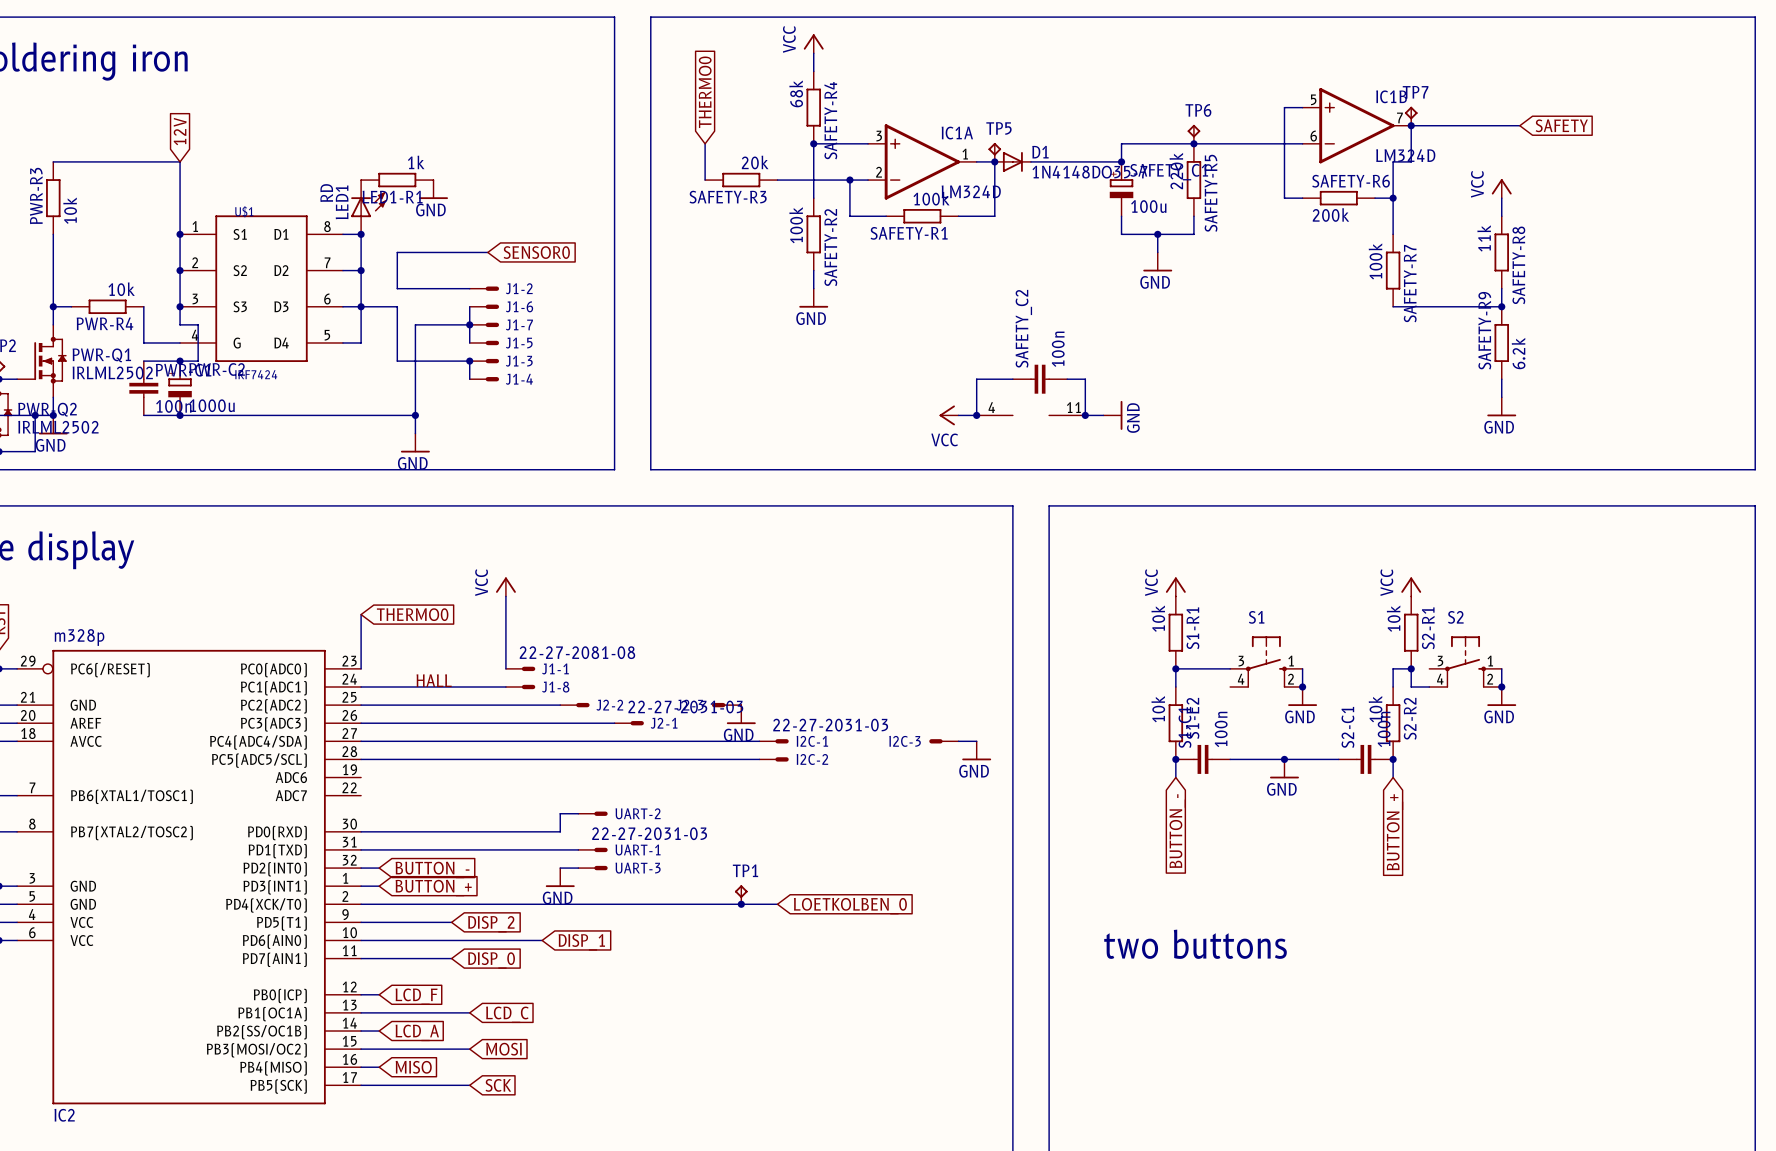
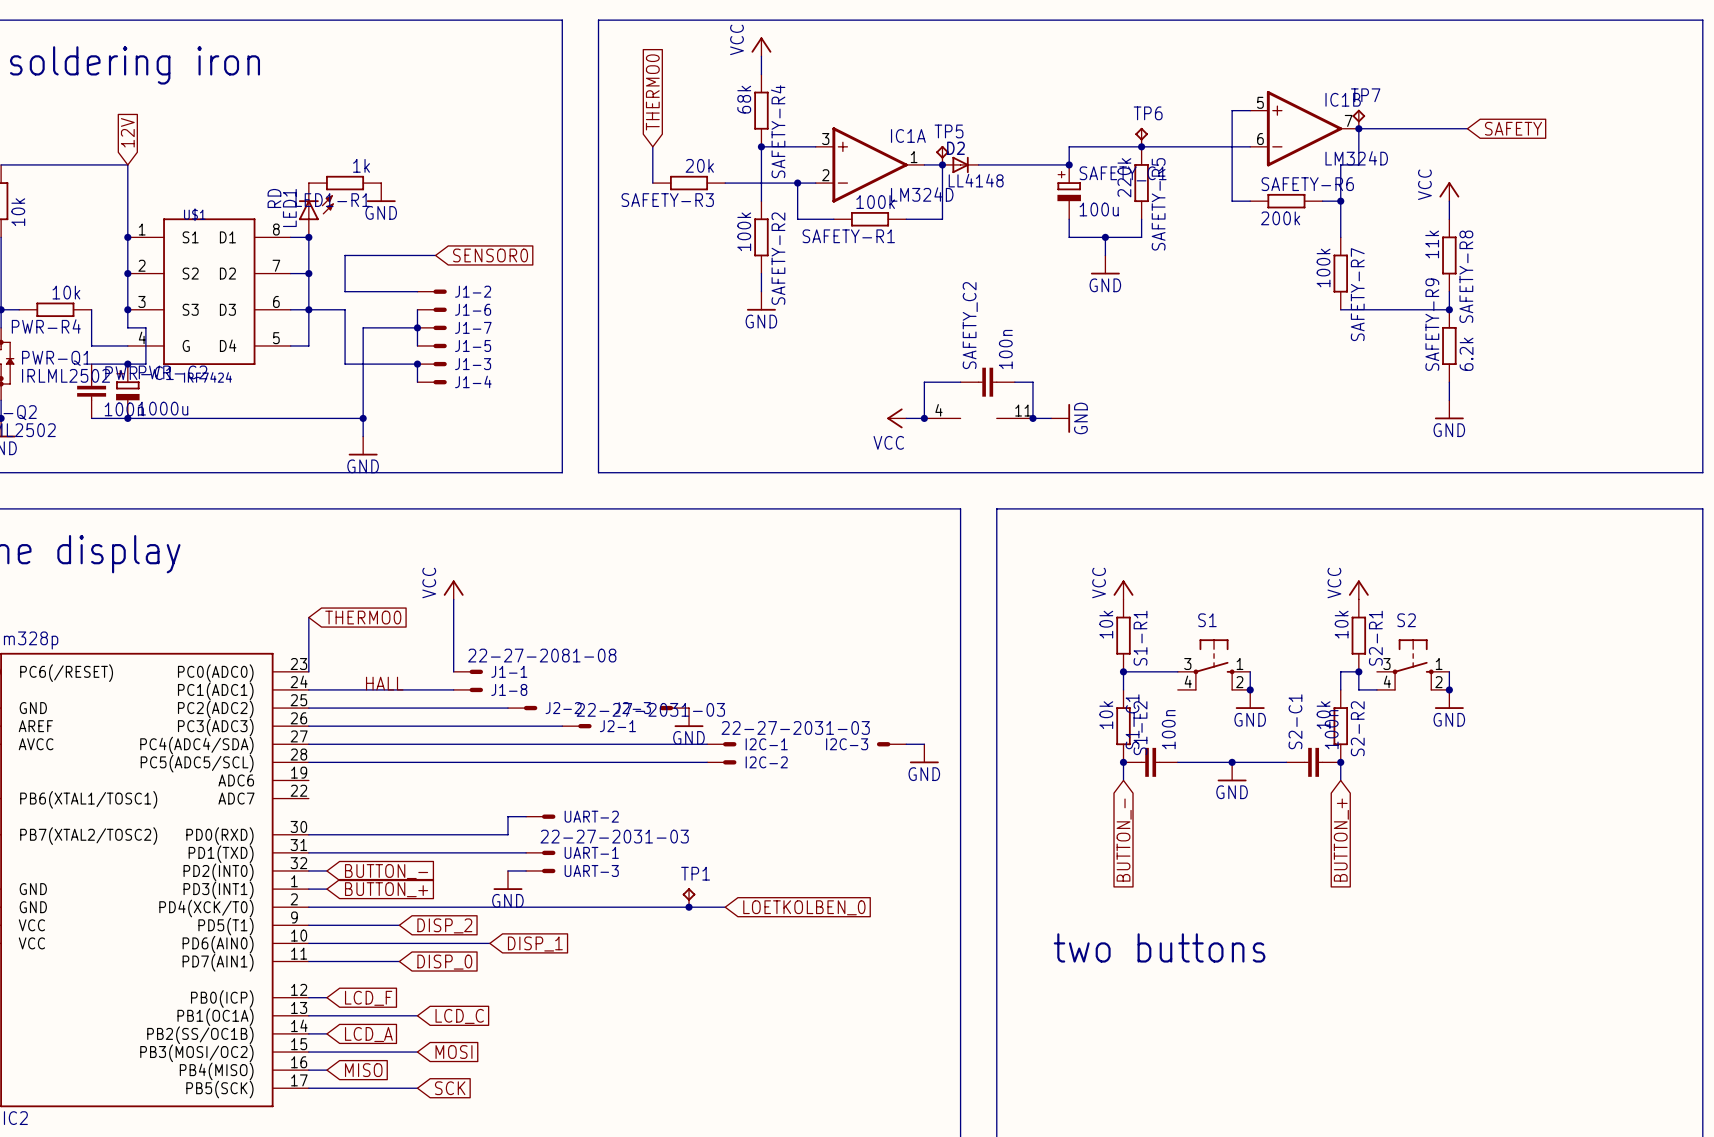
D1: 1N4148DO35-7 (1012, 161) -> none
D2: none -> LL4148 (960, 164)

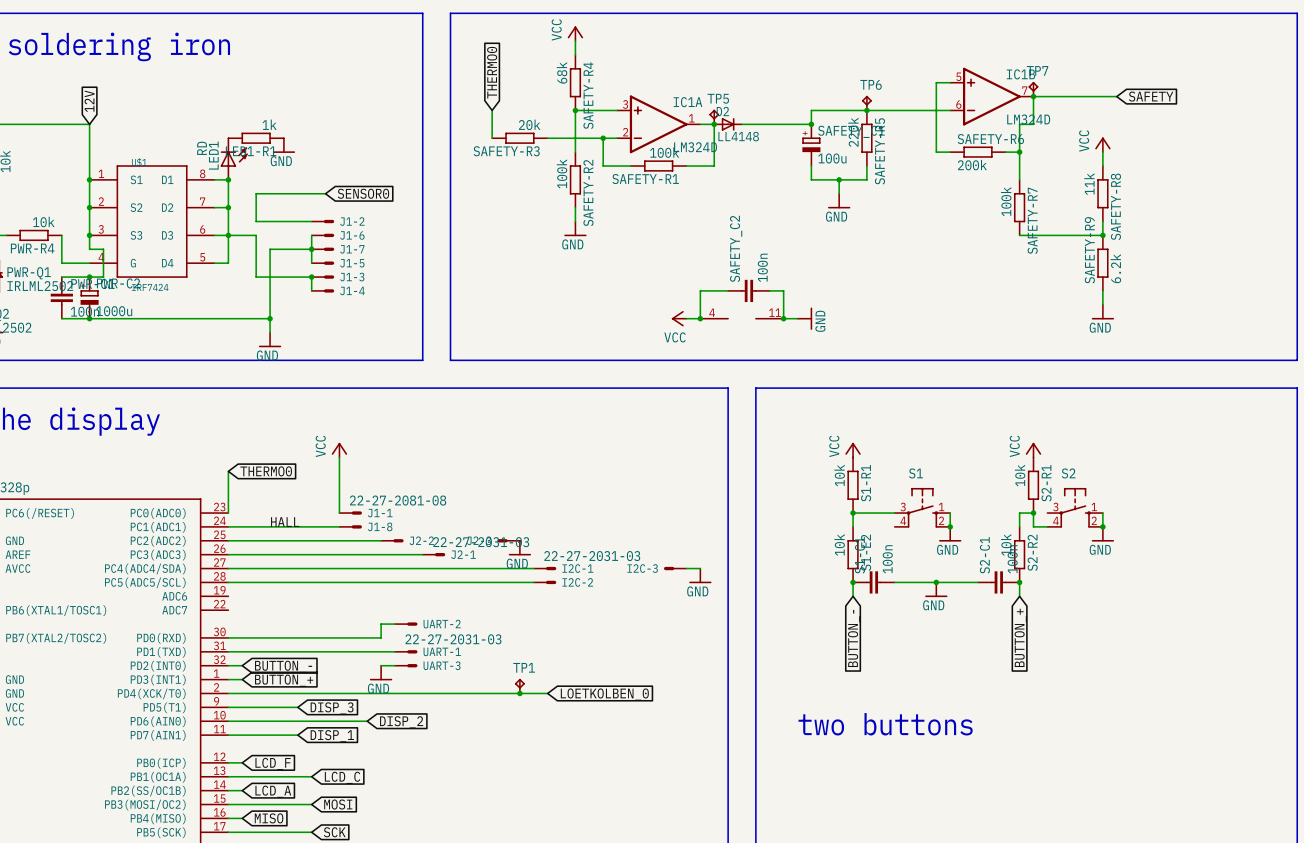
global label: DISP_2 (444, 925) -> DISP_3 (332, 708)
global label: DISP_1 (535, 944) -> DISP_2 (401, 722)
global label: DISP_0 (444, 962) -> DISP_1 (332, 736)

